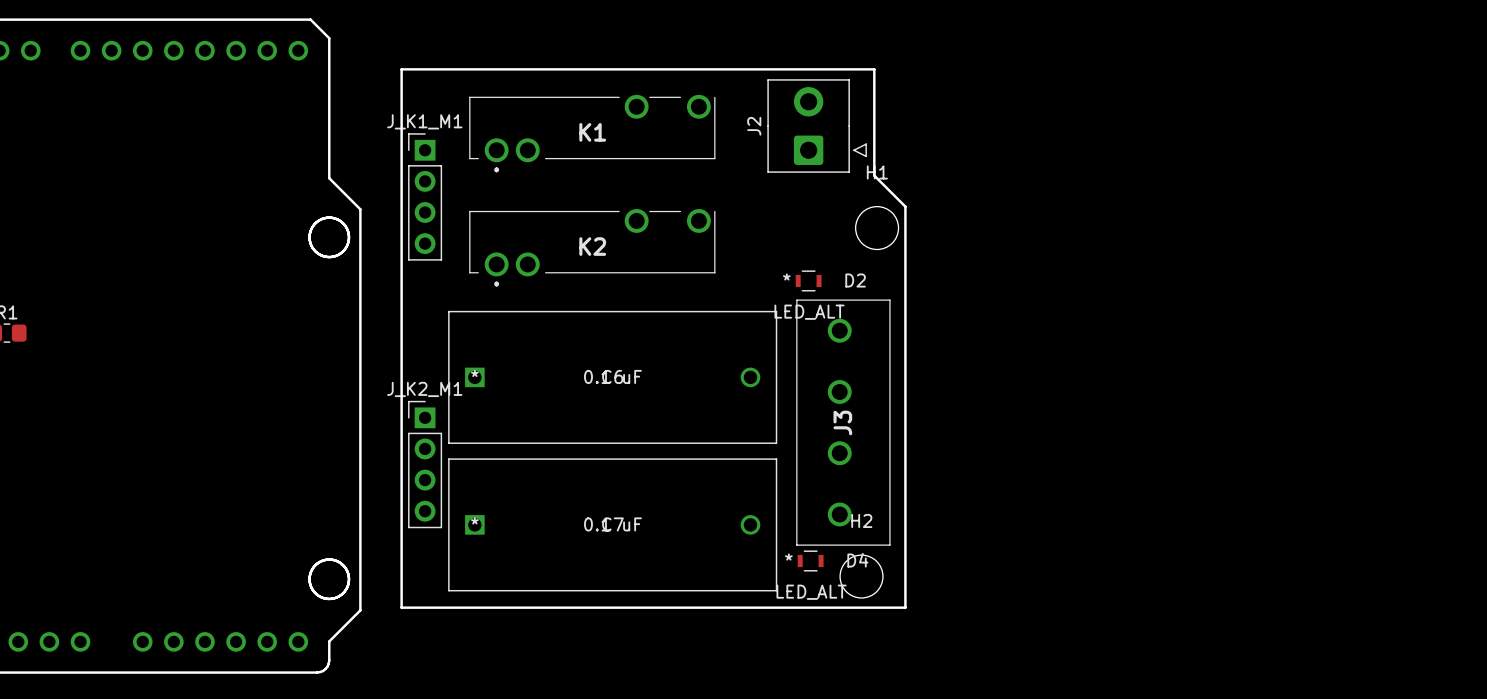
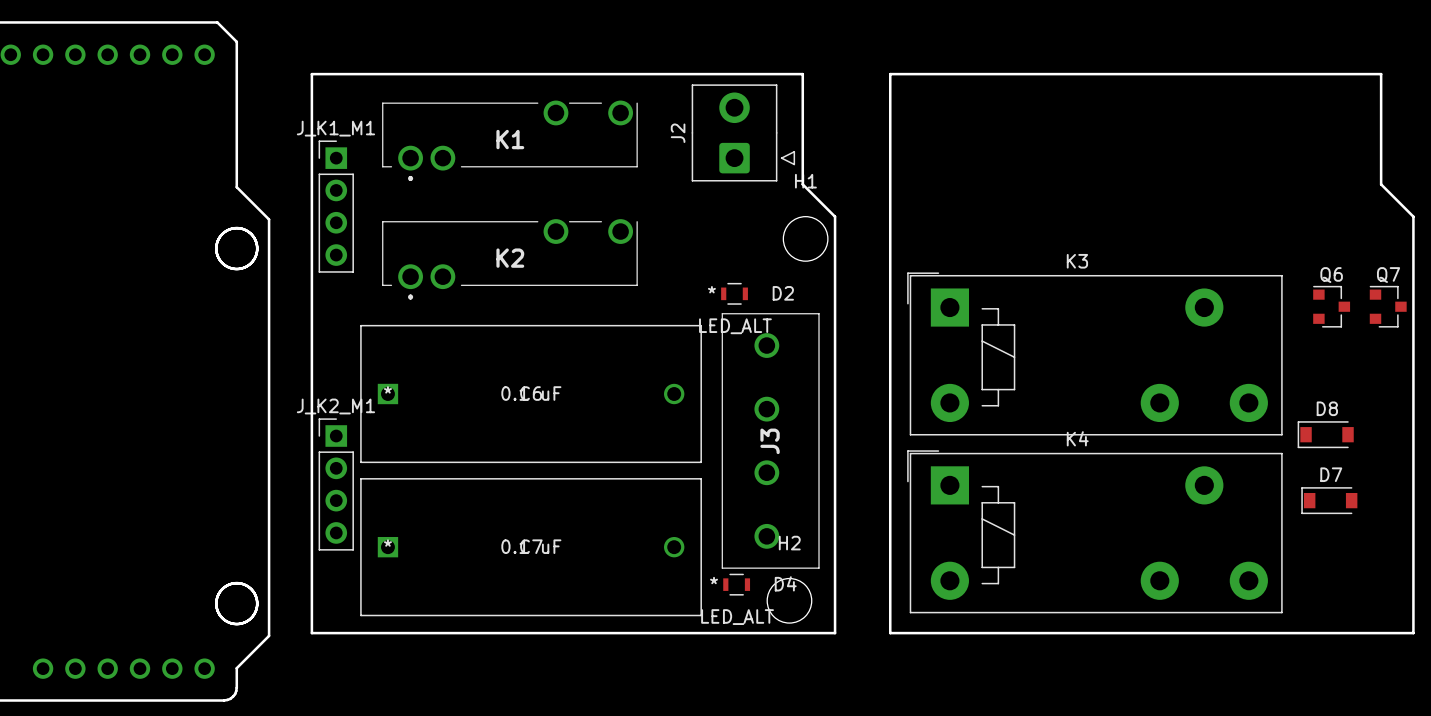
board edge: none -> (890, 74) (890, 633) (1413, 633) (1413, 216) (1381, 184) (1381, 74) (890, 74)
Q6: none -> (1331, 306)
Q7: none -> (1388, 306)
K3: none -> (1094, 353)
D8: none -> (1325, 434)
D7: none -> (1329, 500)
K4: none -> (1094, 531)

